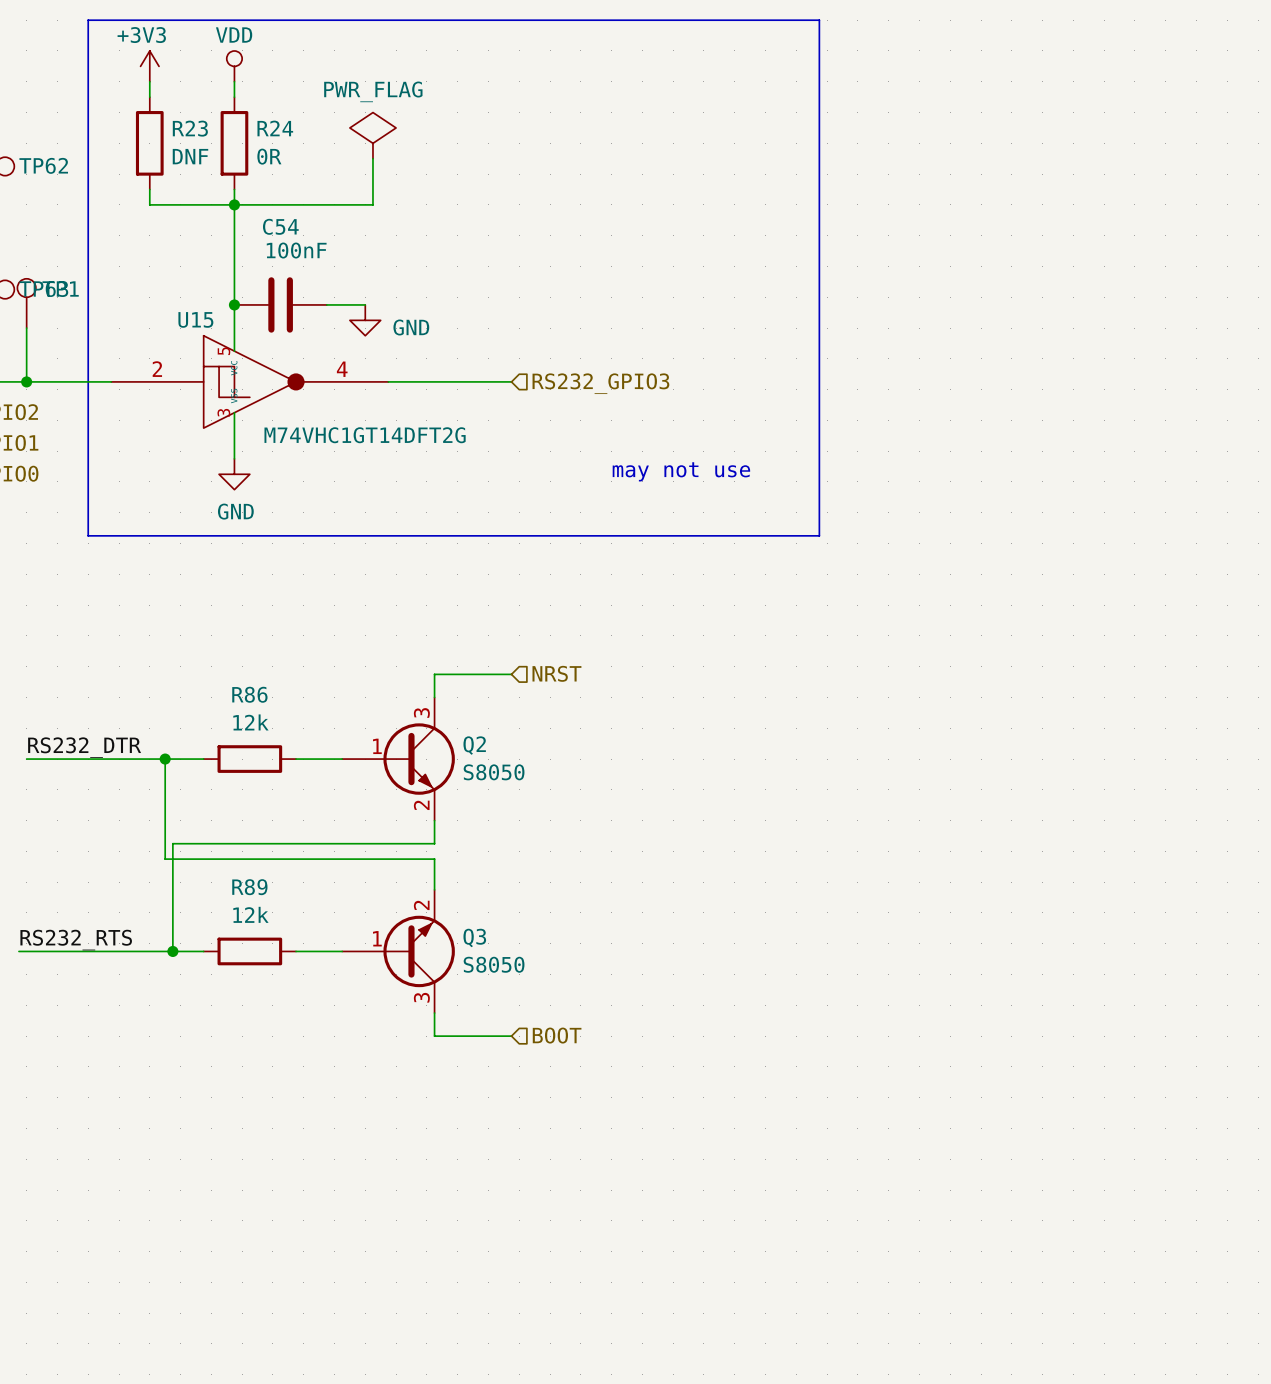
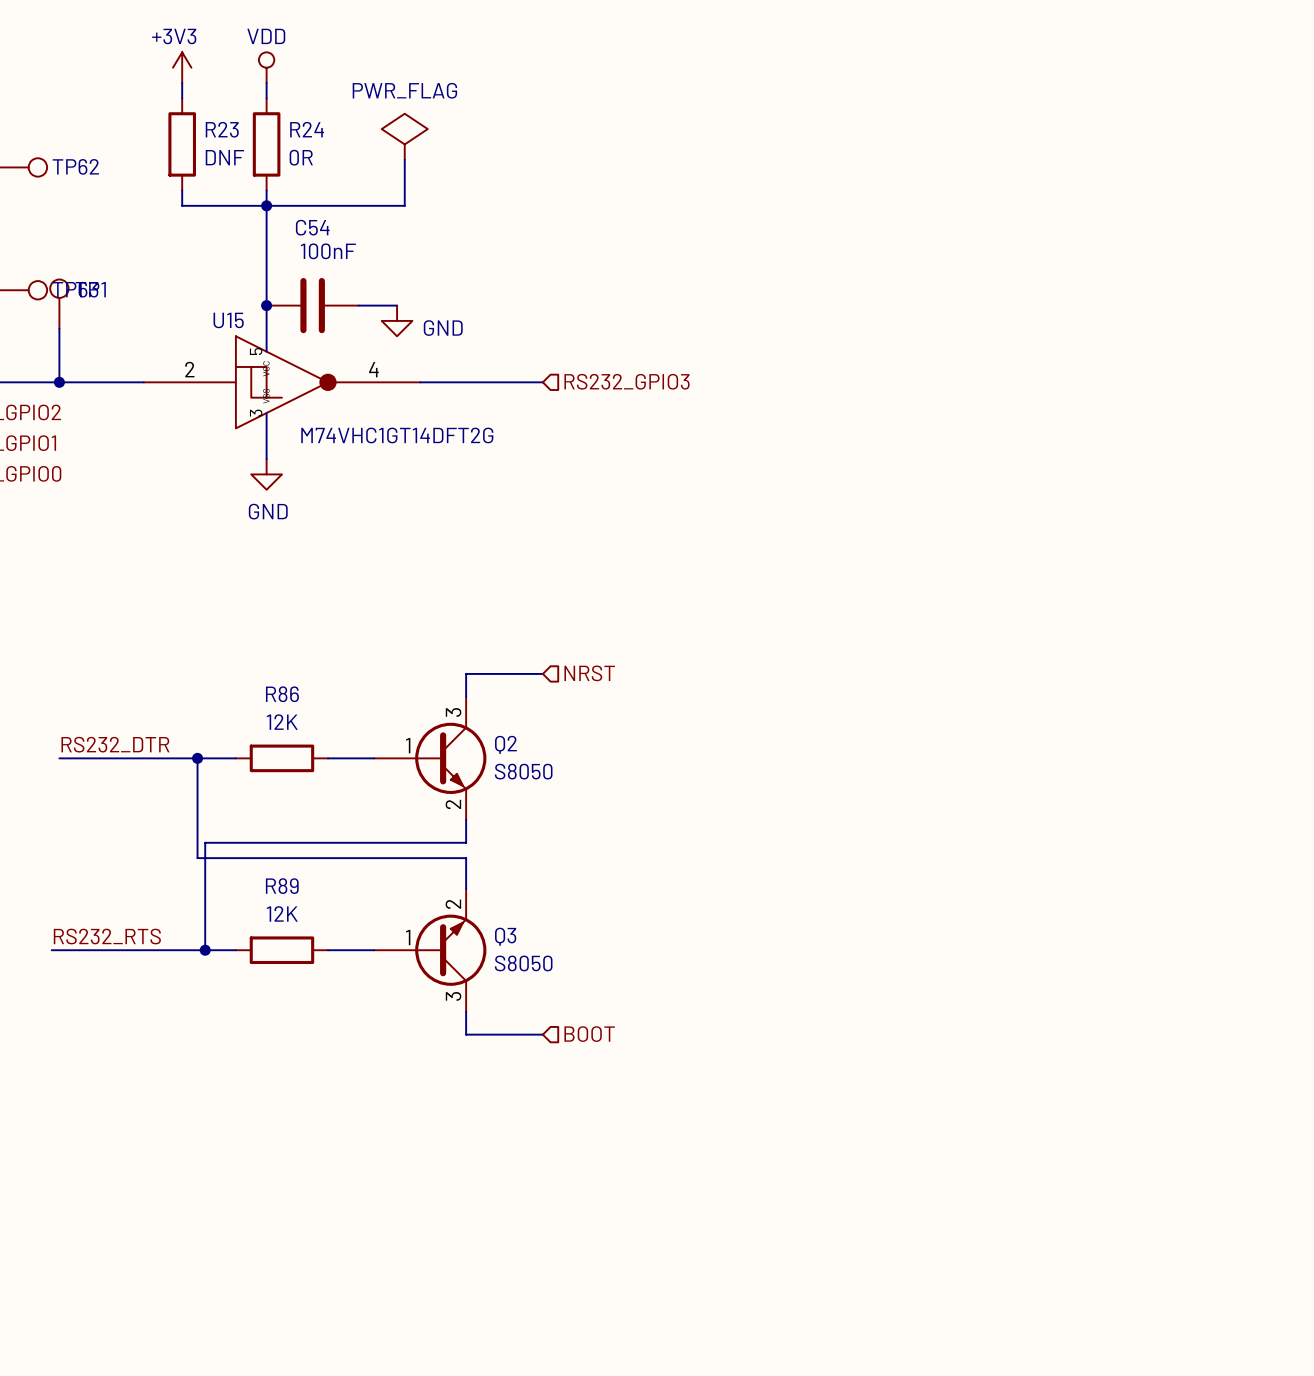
line: (88, 20) (88, 535) (819, 535) (819, 20) (88, 20) -> none
text: may not use (681, 471) -> none
R86 value: 12k (250, 722) -> 12K (282, 722)
R89 value: 12k (250, 914) -> 12K (282, 913)

